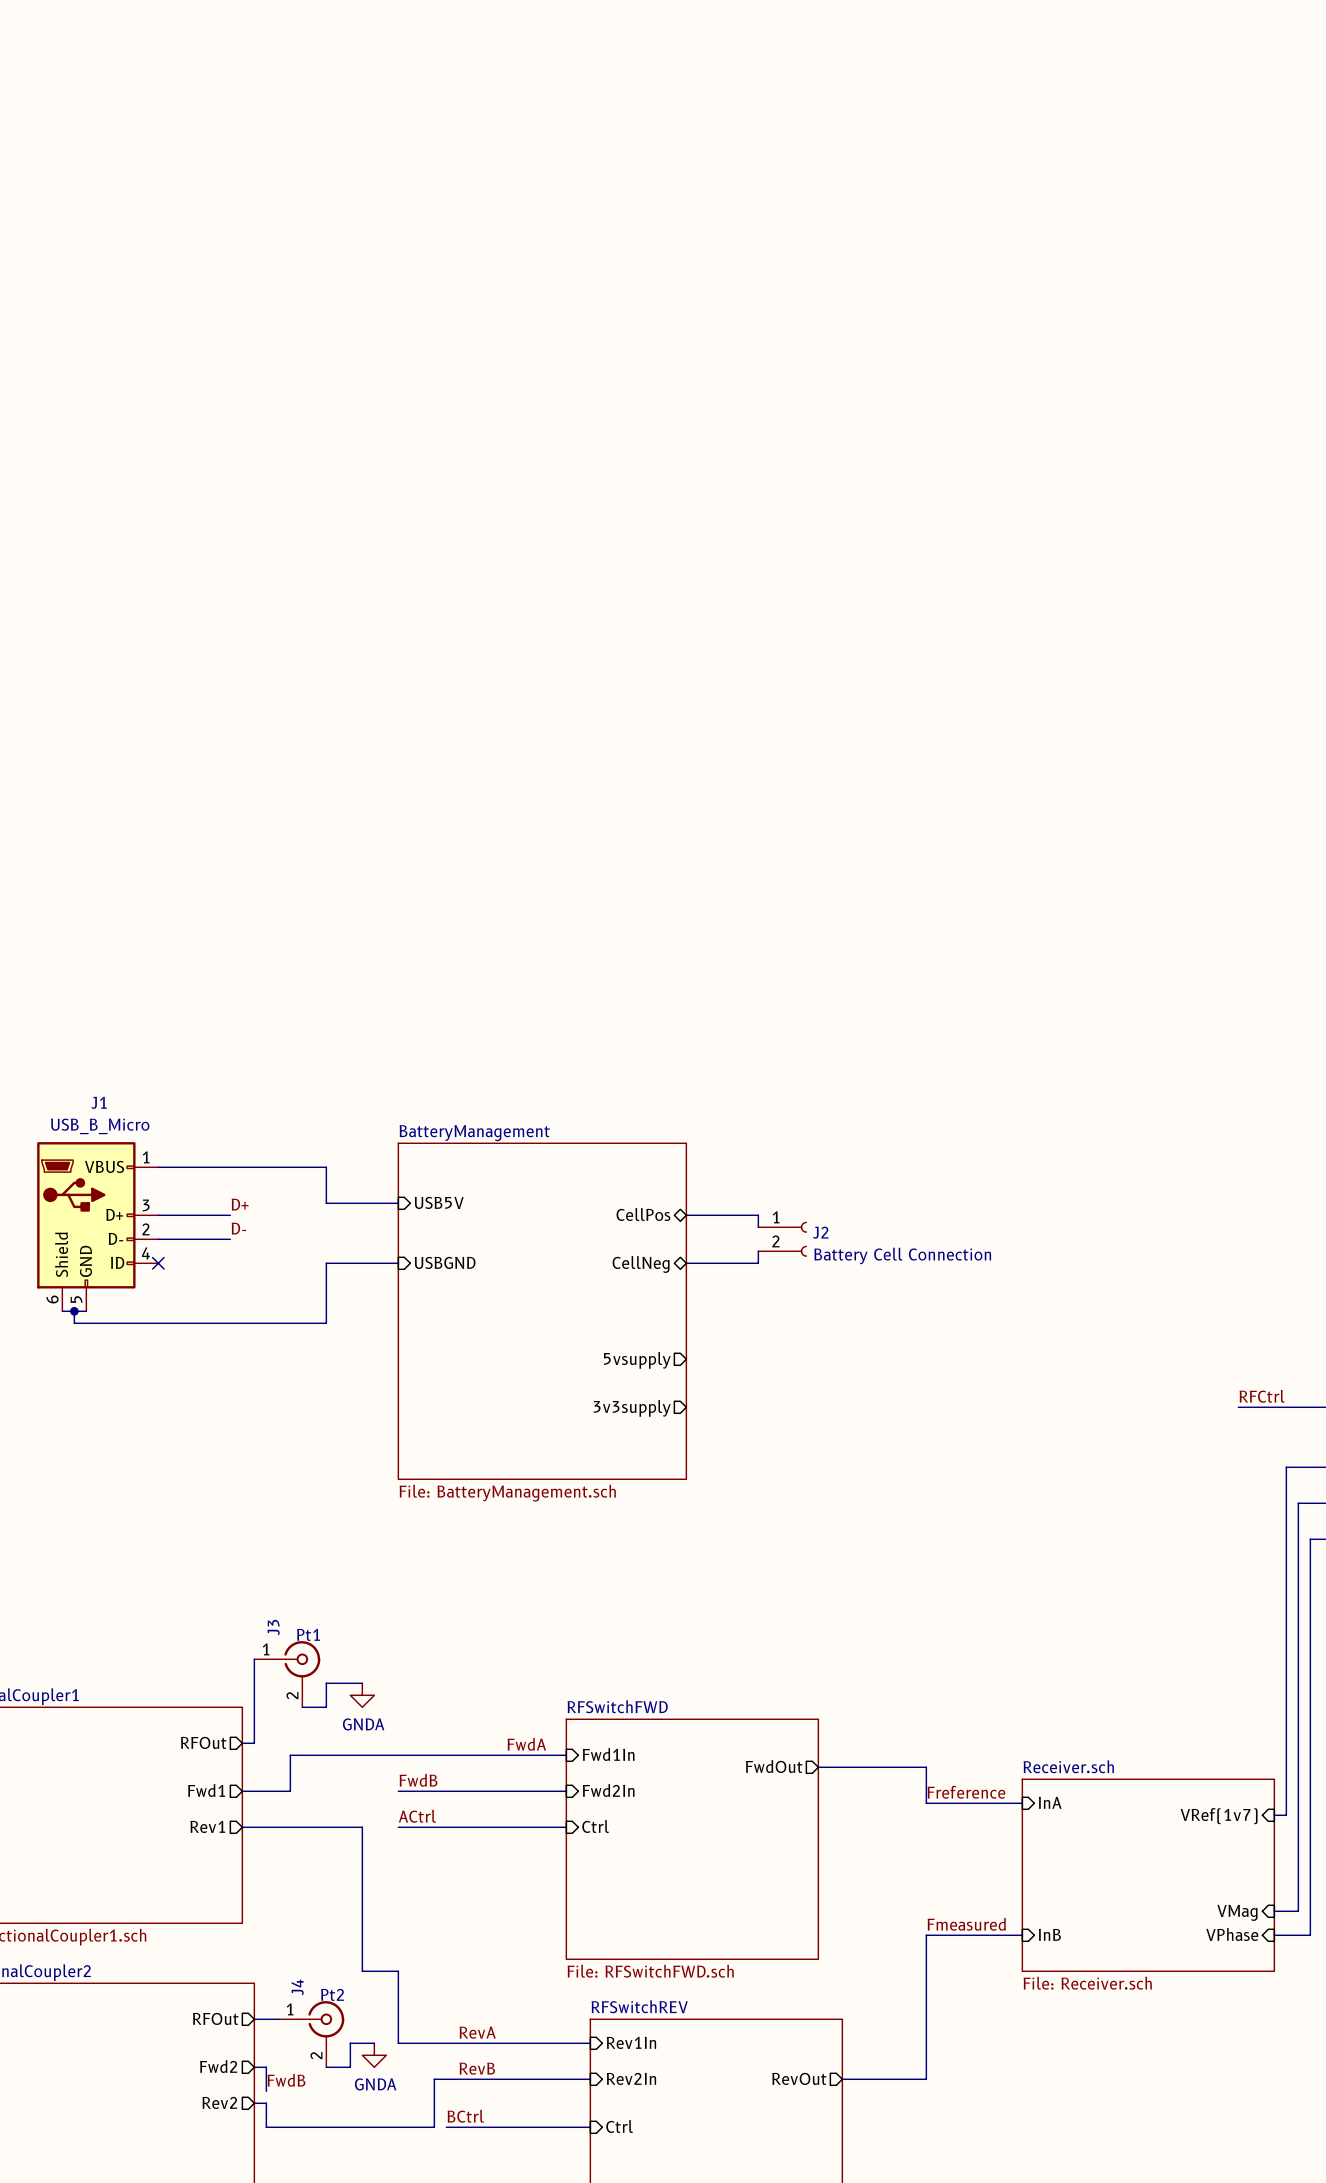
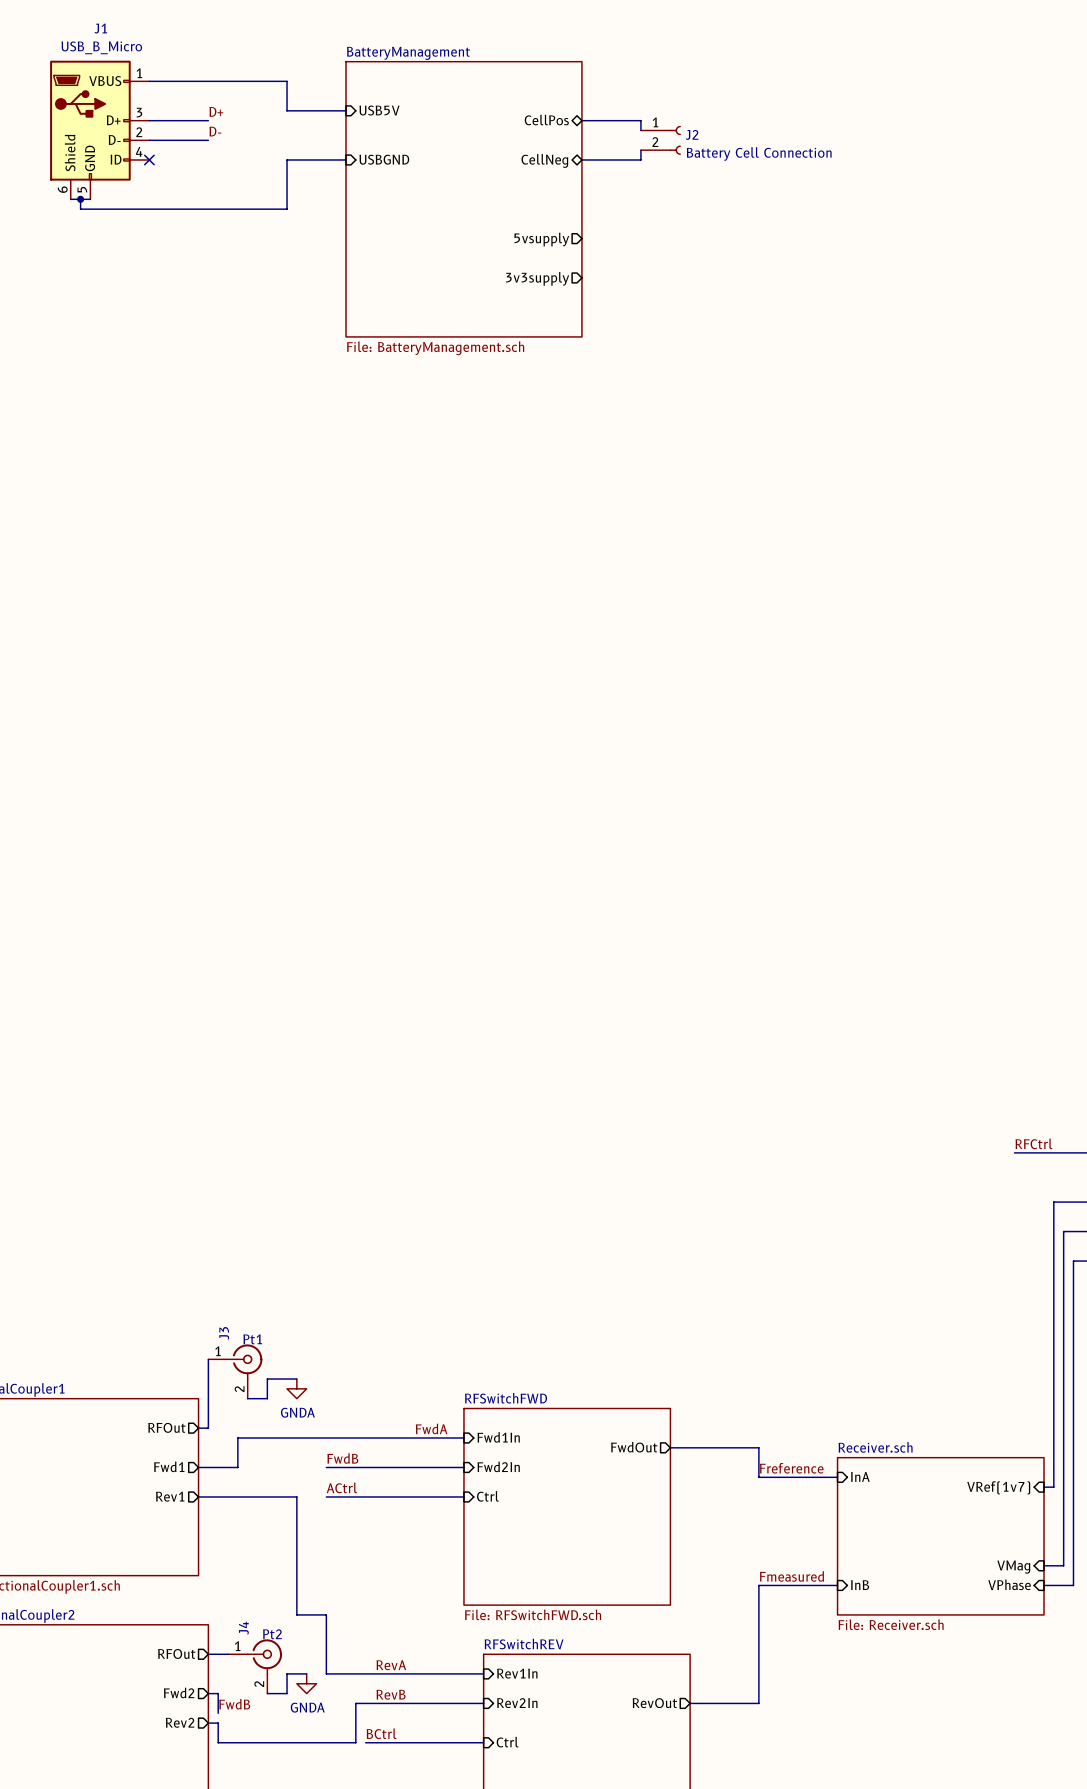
wire: none -> (149, 81) (287, 81) (287, 110) (346, 110)
sheet pin: none -> USB5V (379, 110)
label: none -> D+ (216, 111)
sheet pin: none -> CellPos (546, 120)
wire: none -> (149, 120) (208, 120)
wire: none -> (581, 120) (640, 120) (640, 130)
label: none -> D- (215, 131)
wire: none -> (149, 140) (208, 140)
wire: none -> (640, 150) (640, 159) (581, 159)
sheet pin: none -> USBGND (384, 159)
no-connect mark: none -> (149, 159)
wire: none -> (346, 159) (287, 159) (287, 209) (80, 209) (80, 199)
sheet pin: none -> CellNeg (544, 160)
wire: none -> (70, 199) (90, 199)
junction: none -> (80, 199)
sheet BatteryManagement: none -> File: BatteryManagement.sch (463, 199)
sheet pin: none -> 5vsupply (541, 239)
sheet pin: none -> 3v3supply (537, 278)
wire: (158, 1167) (326, 1167) (326, 1203) (398, 1203) -> none
sheet pin: USB5V (439, 1202) -> none
label: D+ (240, 1204) -> none
sheet pin: CellPos (643, 1214) -> none
wire: (158, 1215) (230, 1215) -> none
wire: (686, 1215) (758, 1215) (758, 1227) -> none
J1 position: (97, 1226) -> (99, 130)
label: D- (238, 1228) -> none
wire: (158, 1239) (230, 1239) -> none
J2 position: (782, 1239) -> (660, 140)
wire: (758, 1251) (758, 1263) (686, 1263) -> none
sheet pin: USBGND (445, 1262) -> none
no-connect mark: (158, 1263) -> none
wire: (398, 1263) (326, 1263) (326, 1323) (74, 1323) (74, 1311) -> none
sheet pin: CellNeg (641, 1264) -> none
wire: (62, 1311) (86, 1311) -> none
junction: (74, 1311) -> none
sheet BatteryManagement: File: BatteryManagement.sch (542, 1311) -> none
sheet pin: 5vsupply (637, 1360) -> none
sheet pin: 3v3supply (632, 1408) -> none

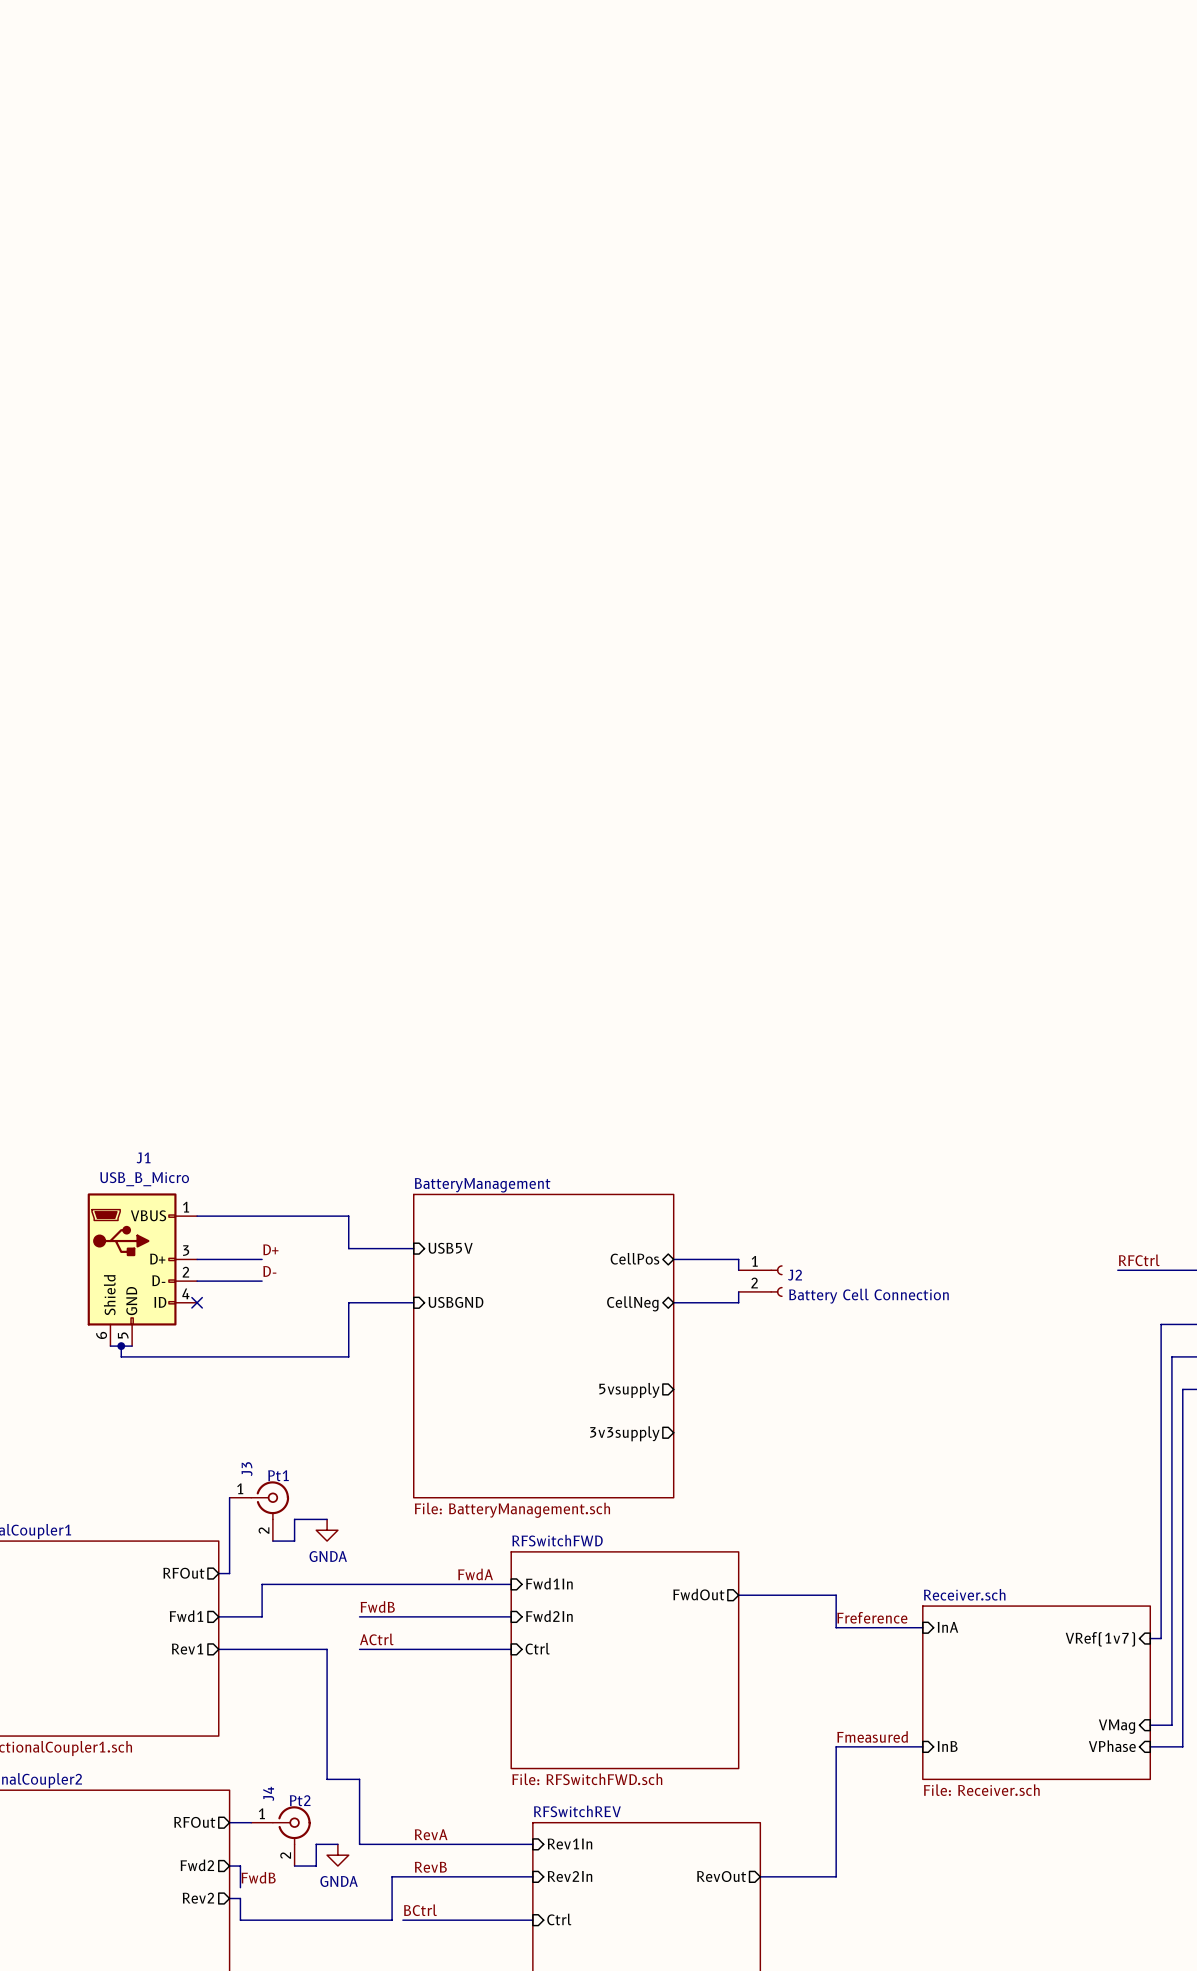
wire: (149, 81) (287, 81) (287, 110) (346, 110) -> none
sheet pin: USB5V (379, 110) -> none
label: D+ (216, 111) -> none
wire: (149, 120) (208, 120) -> none
sheet pin: CellPos (546, 120) -> none
wire: (581, 120) (640, 120) (640, 130) -> none
J1 position: (99, 130) -> (142, 1269)
label: D- (215, 131) -> none
wire: (149, 140) (208, 140) -> none
J2 position: (660, 140) -> (760, 1281)
wire: (640, 150) (640, 159) (581, 159) -> none
no-connect mark: (149, 159) -> none
wire: (346, 159) (287, 159) (287, 209) (80, 209) (80, 199) -> none
sheet pin: USBGND (384, 159) -> none
sheet pin: CellNeg (544, 160) -> none
wire: (70, 199) (90, 199) -> none
junction: (80, 199) -> none
sheet BatteryManagement: File: BatteryManagement.sch (463, 199) -> none
sheet pin: 5vsupply (541, 239) -> none
sheet pin: 3v3supply (537, 278) -> none
wire: none -> (197, 1216) (348, 1216) (348, 1248) (413, 1248)
sheet pin: none -> USB5V (450, 1248)
label: none -> D+ (270, 1249)
sheet pin: none -> CellPos (634, 1258)
wire: none -> (197, 1259) (262, 1259)
wire: none -> (673, 1259) (738, 1259) (738, 1270)
label: none -> D- (269, 1271)
wire: none -> (197, 1281) (262, 1281)
wire: none -> (738, 1291) (738, 1302) (673, 1302)
no-connect mark: none -> (197, 1302)
wire: none -> (413, 1302) (348, 1302) (348, 1356) (121, 1356) (121, 1346)
sheet pin: none -> USBGND (455, 1302)
sheet pin: none -> CellNeg (632, 1303)
wire: none -> (110, 1346) (132, 1346)
junction: none -> (121, 1346)
sheet BatteryManagement: none -> File: BatteryManagement.sch (543, 1346)
sheet pin: none -> 5vsupply (629, 1390)
sheet pin: none -> 3v3supply (624, 1433)

